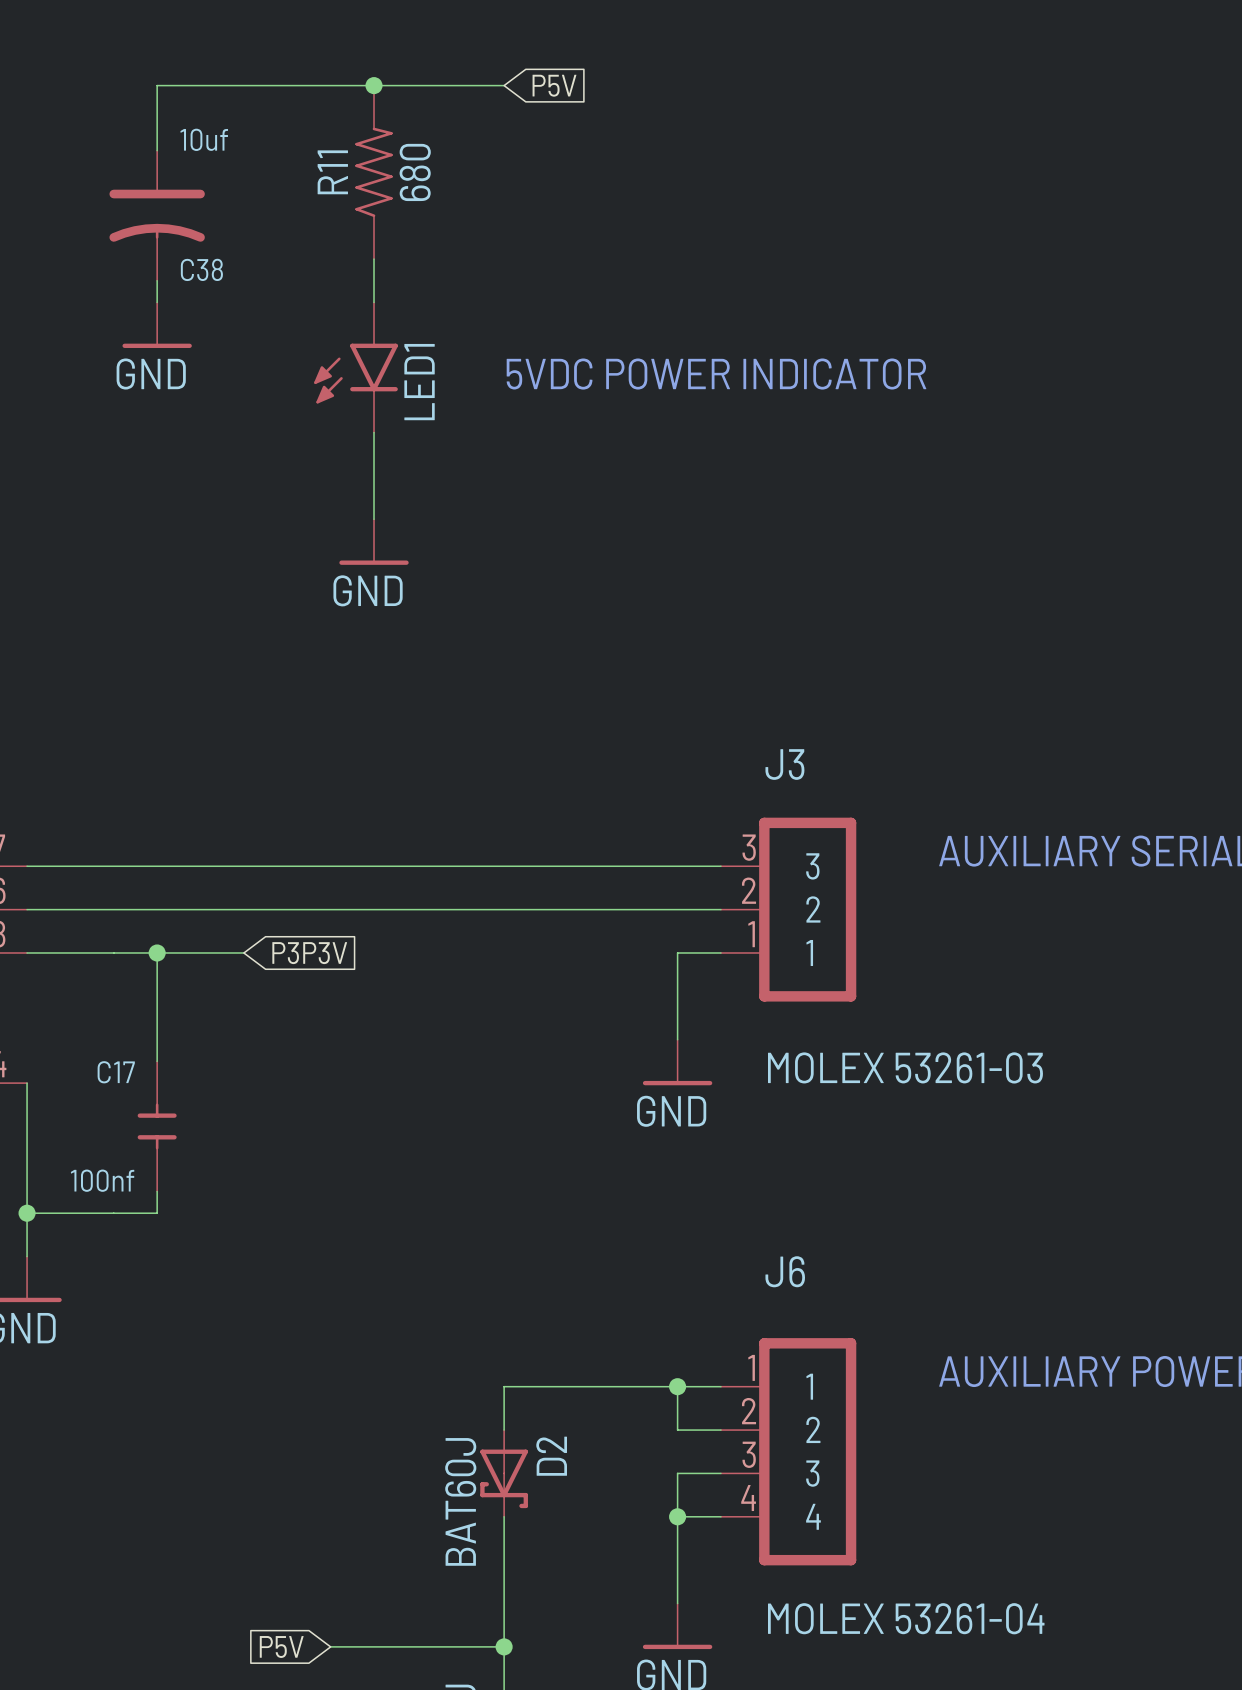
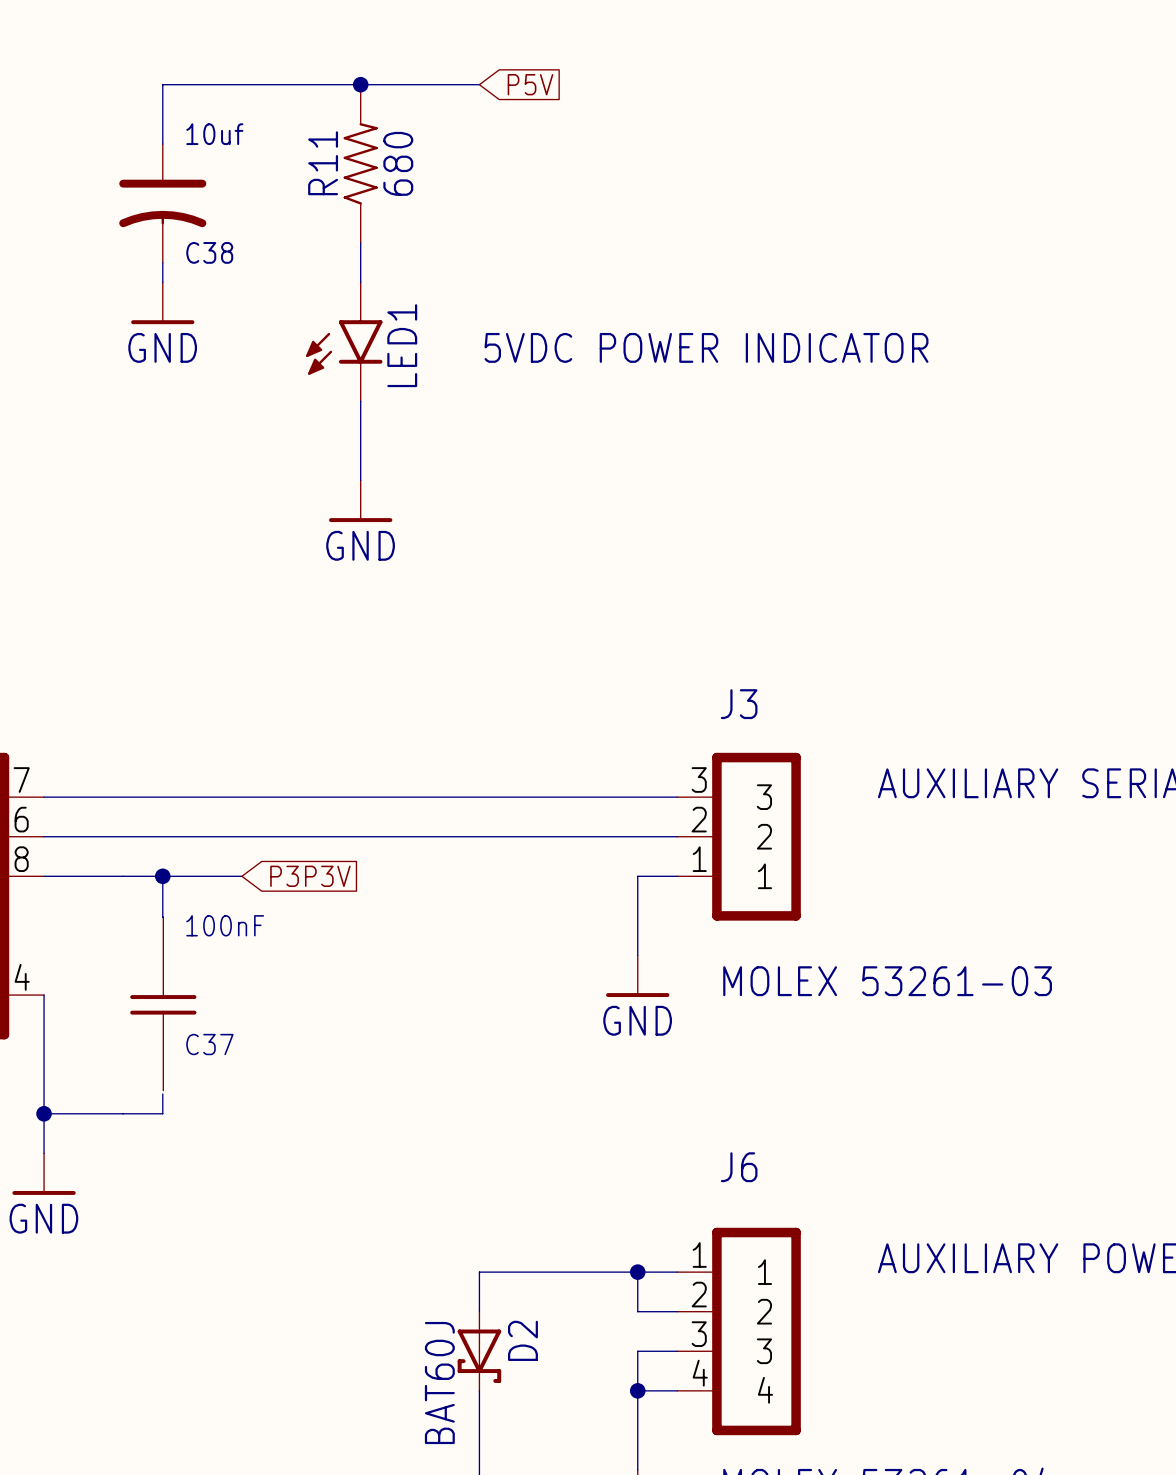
C37: none -> (163, 1003)
C17: 100nf (157, 1126) -> none

